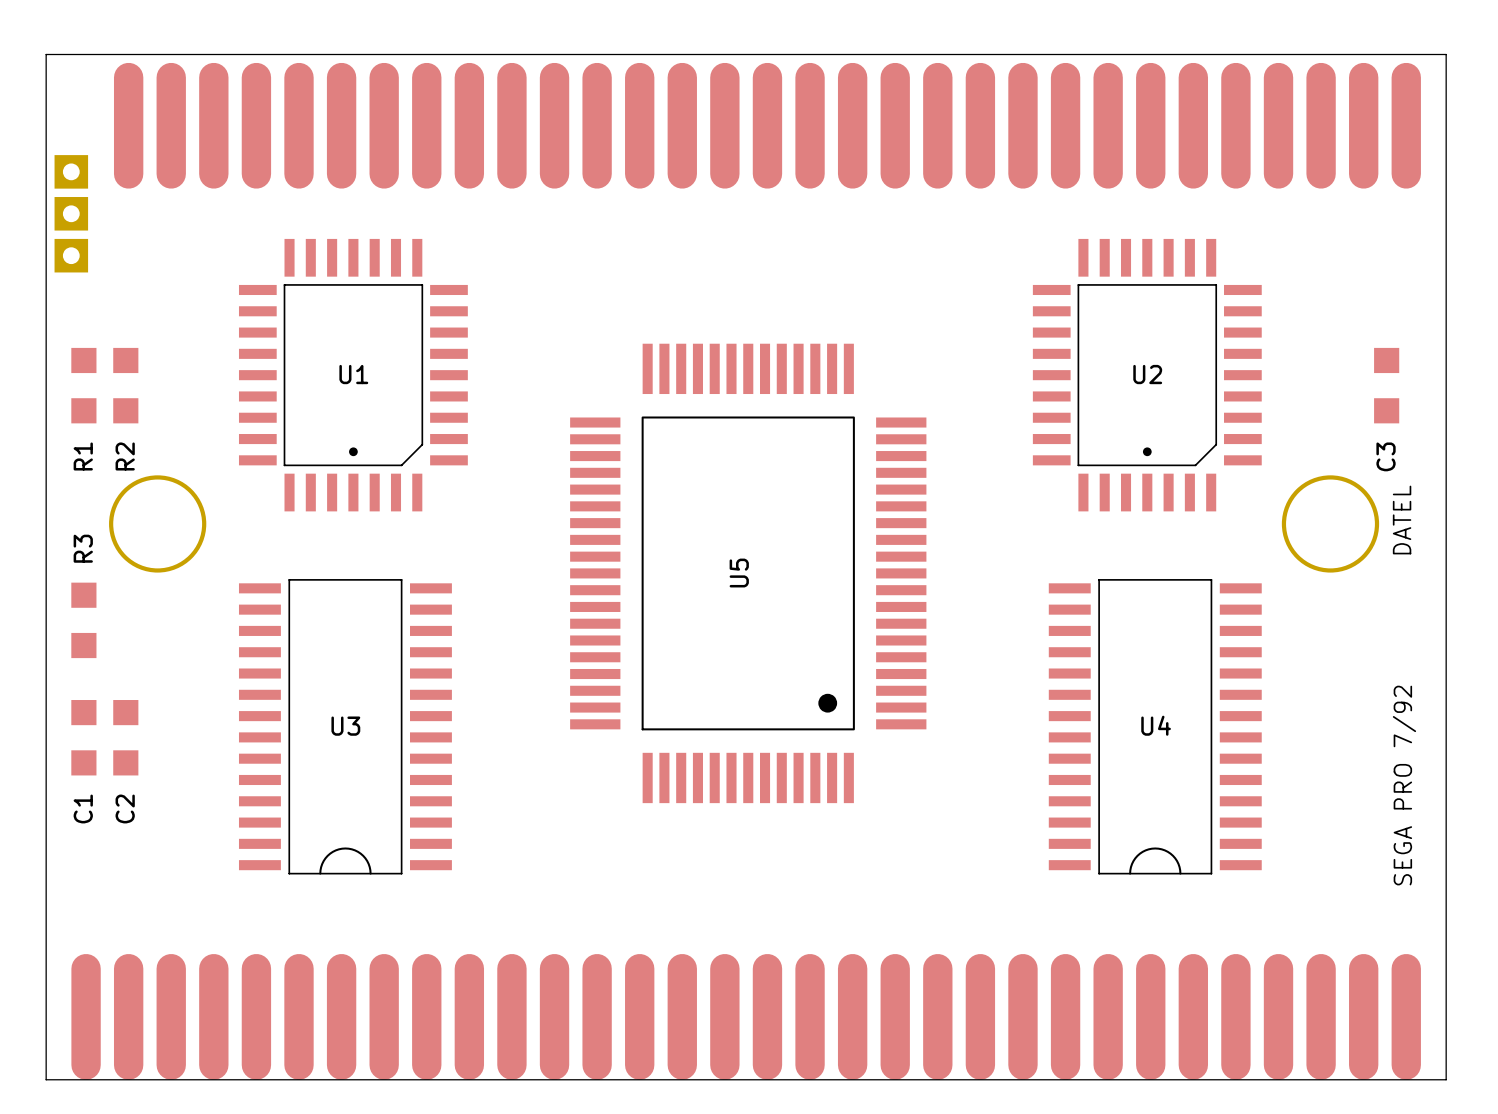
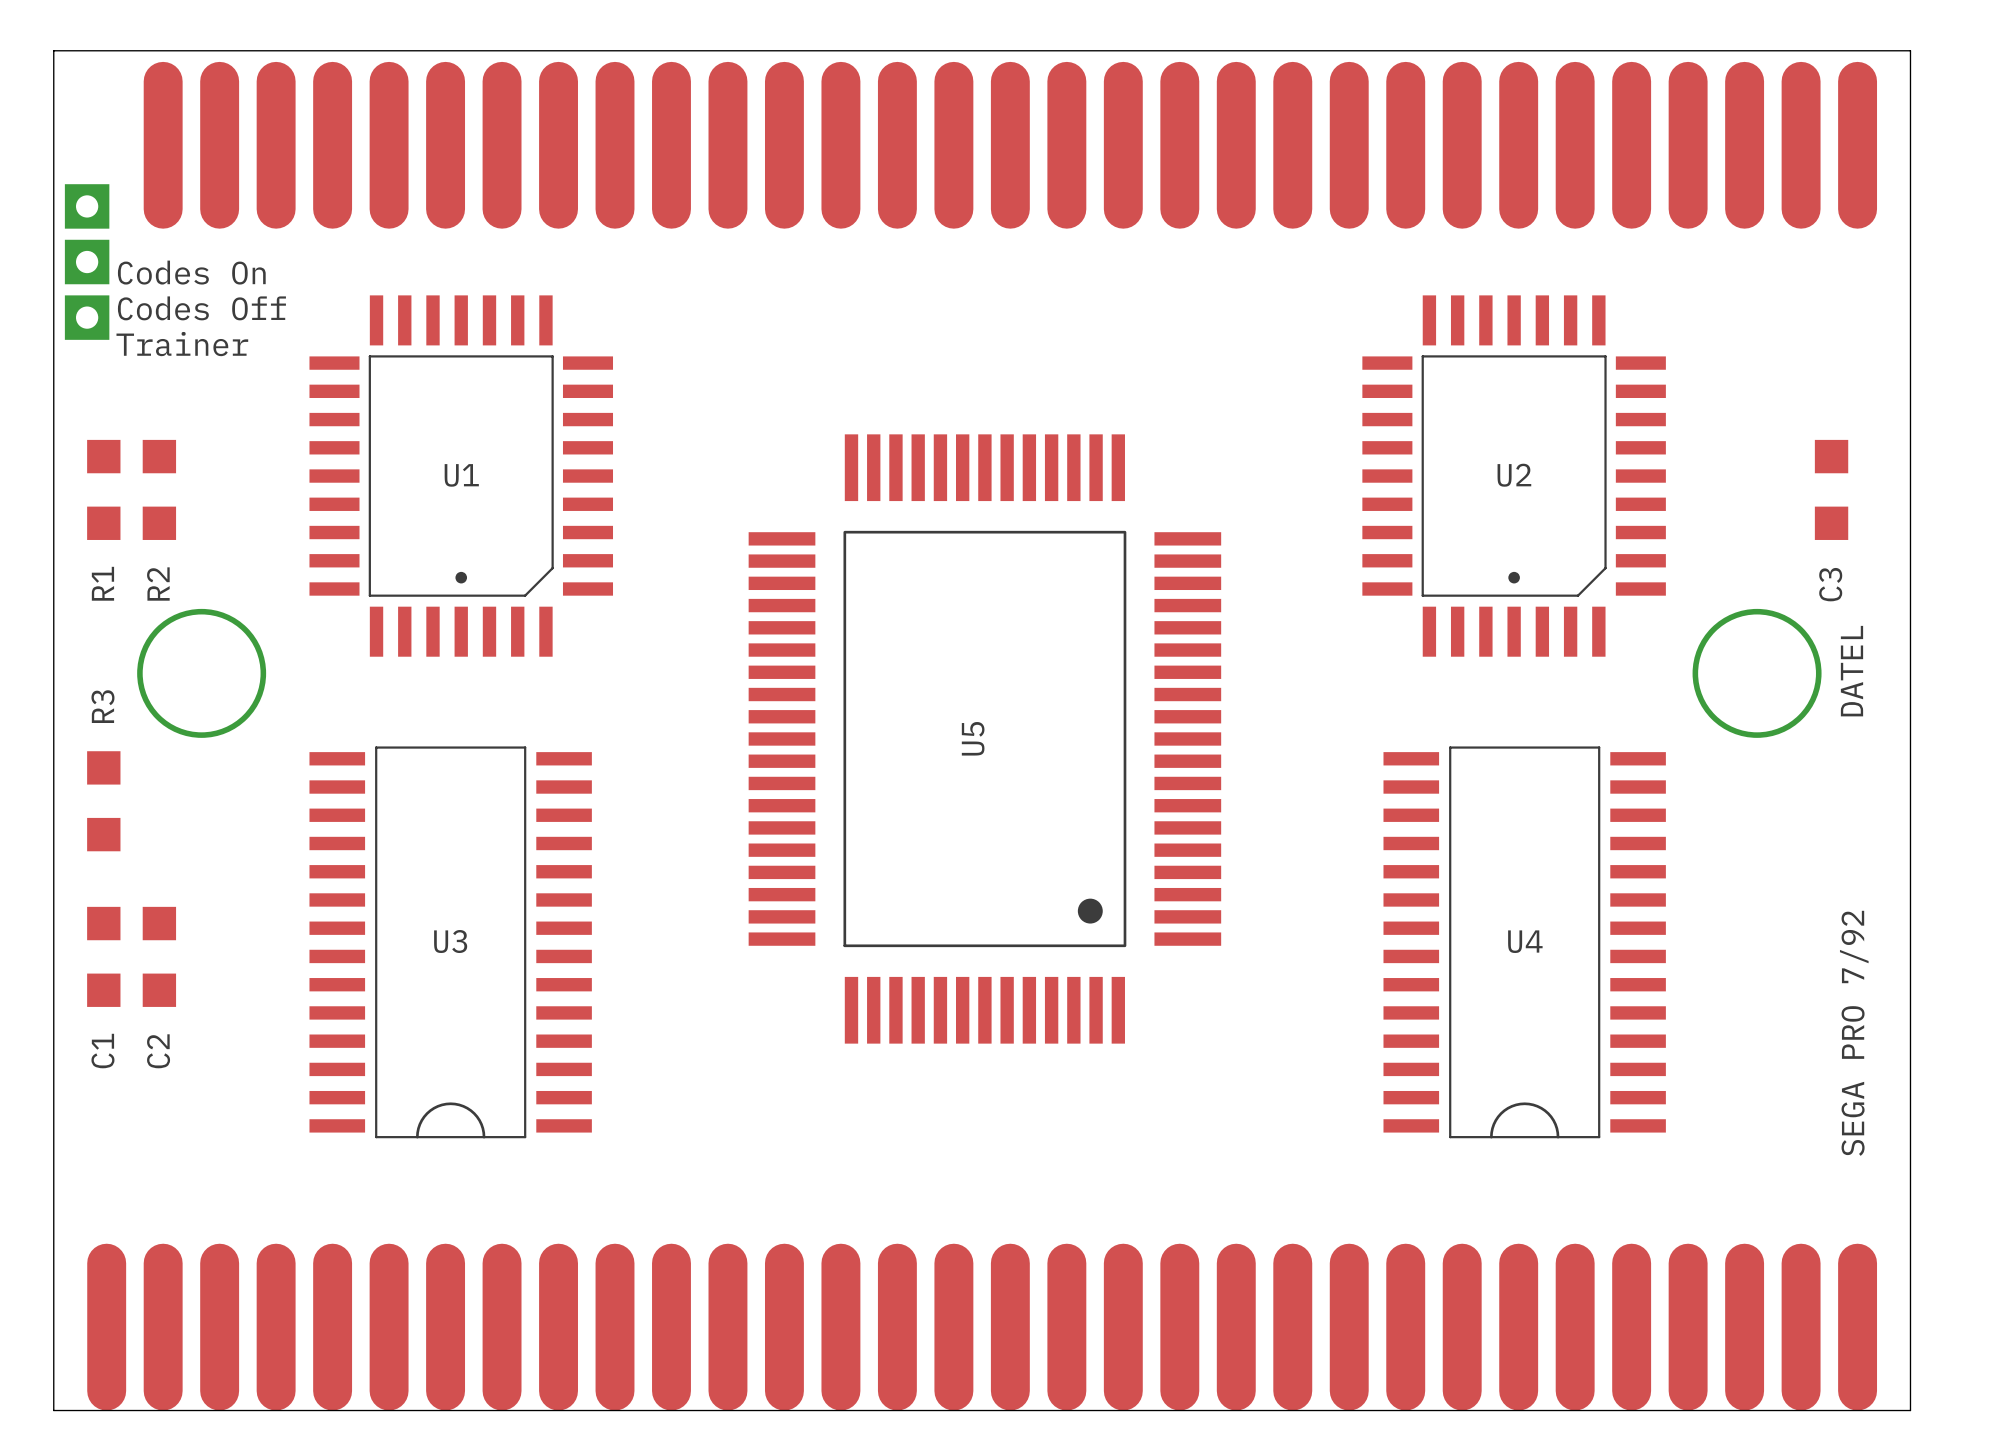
text: none -> Codes On (191, 272)
text: none -> Codes Off (201, 308)
text: none -> Trainer (182, 344)

